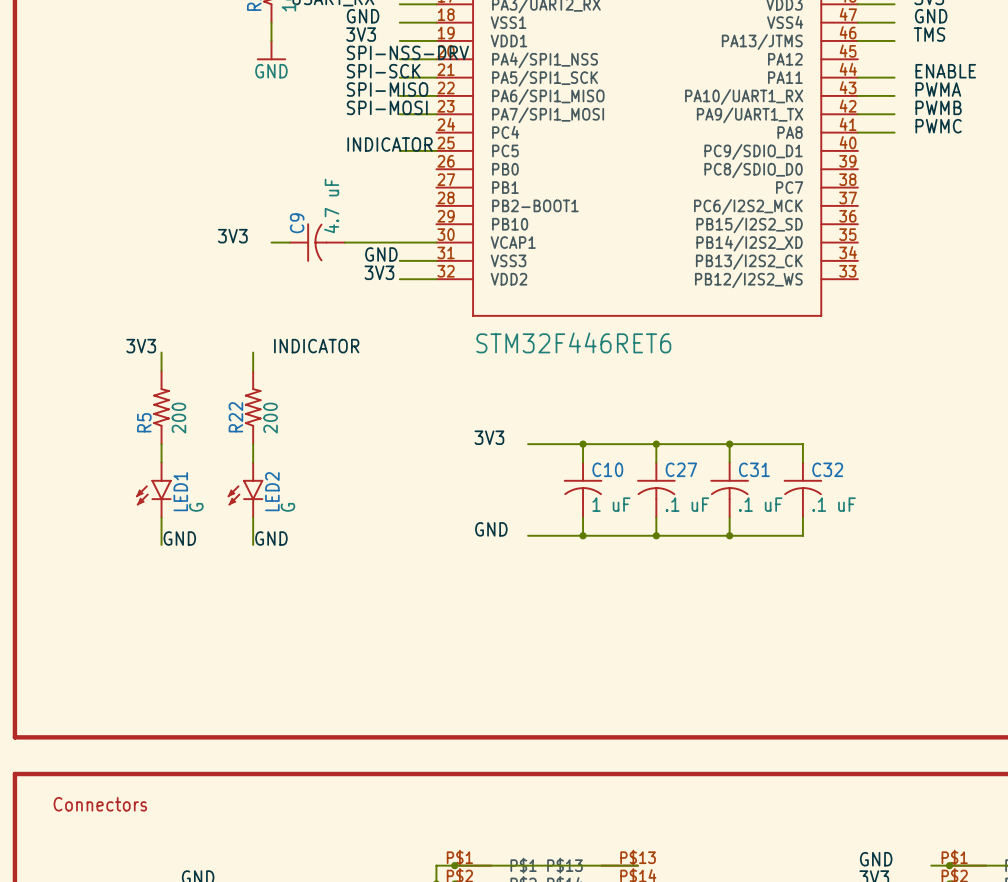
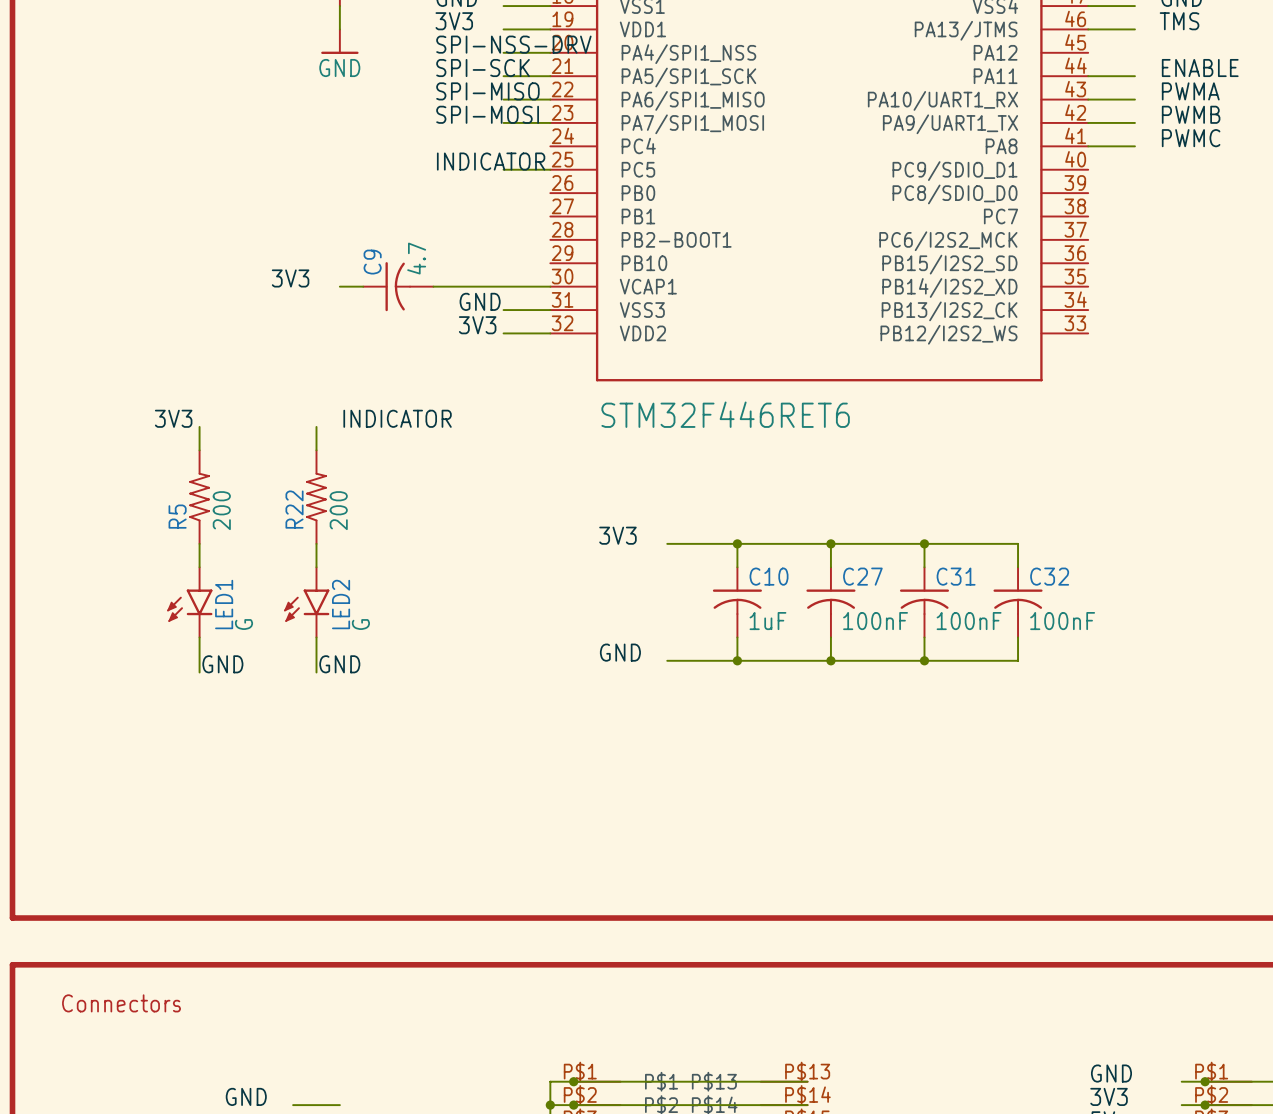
C9 value: 4.7 uF (331, 205) -> 4.7 (416, 258)
C10 value: 1 uF (611, 504) -> 1uF (767, 621)
C27 value: .1 uF (687, 504) -> 100nF (875, 621)
C31 value: .1 uF (760, 504) -> 100nF (969, 621)
C32 value: .1 uF (834, 504) -> 100nF (1062, 621)

